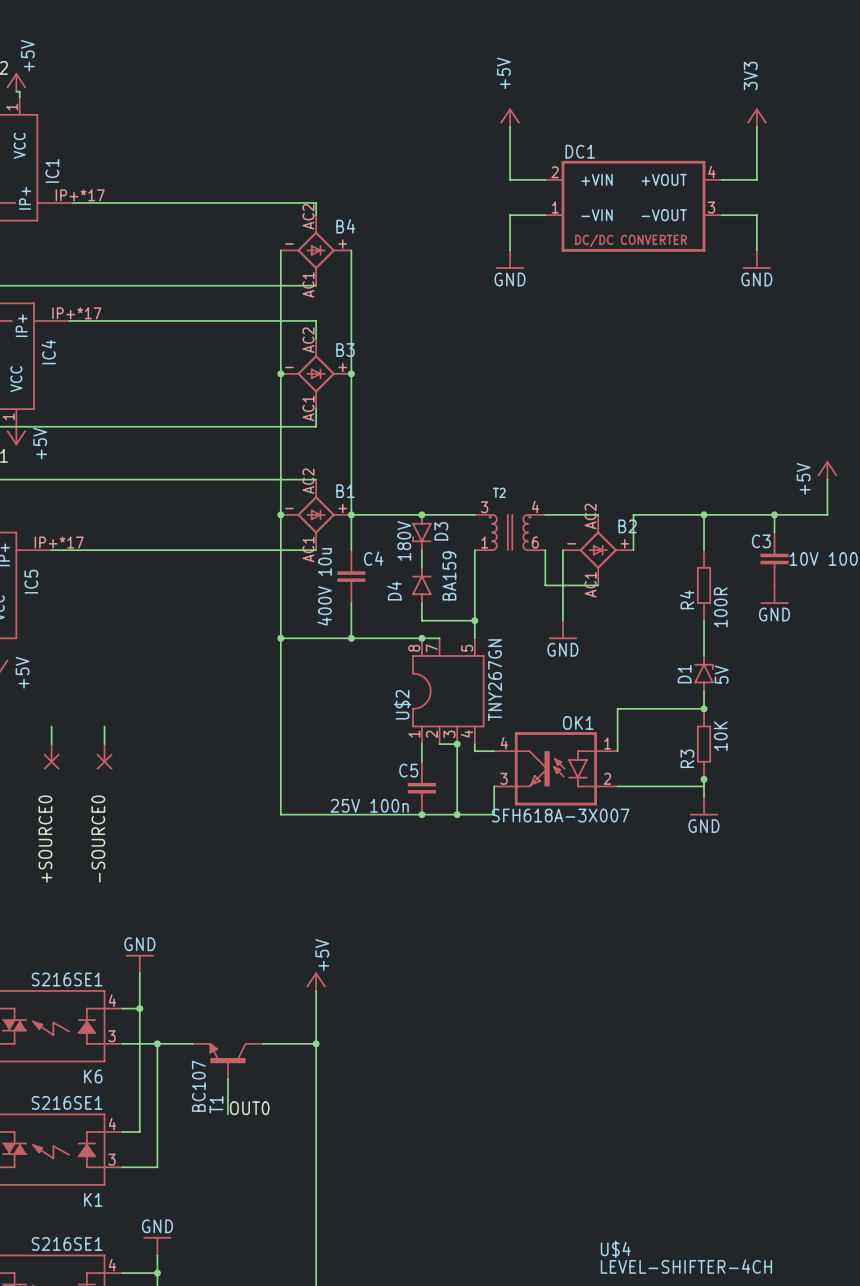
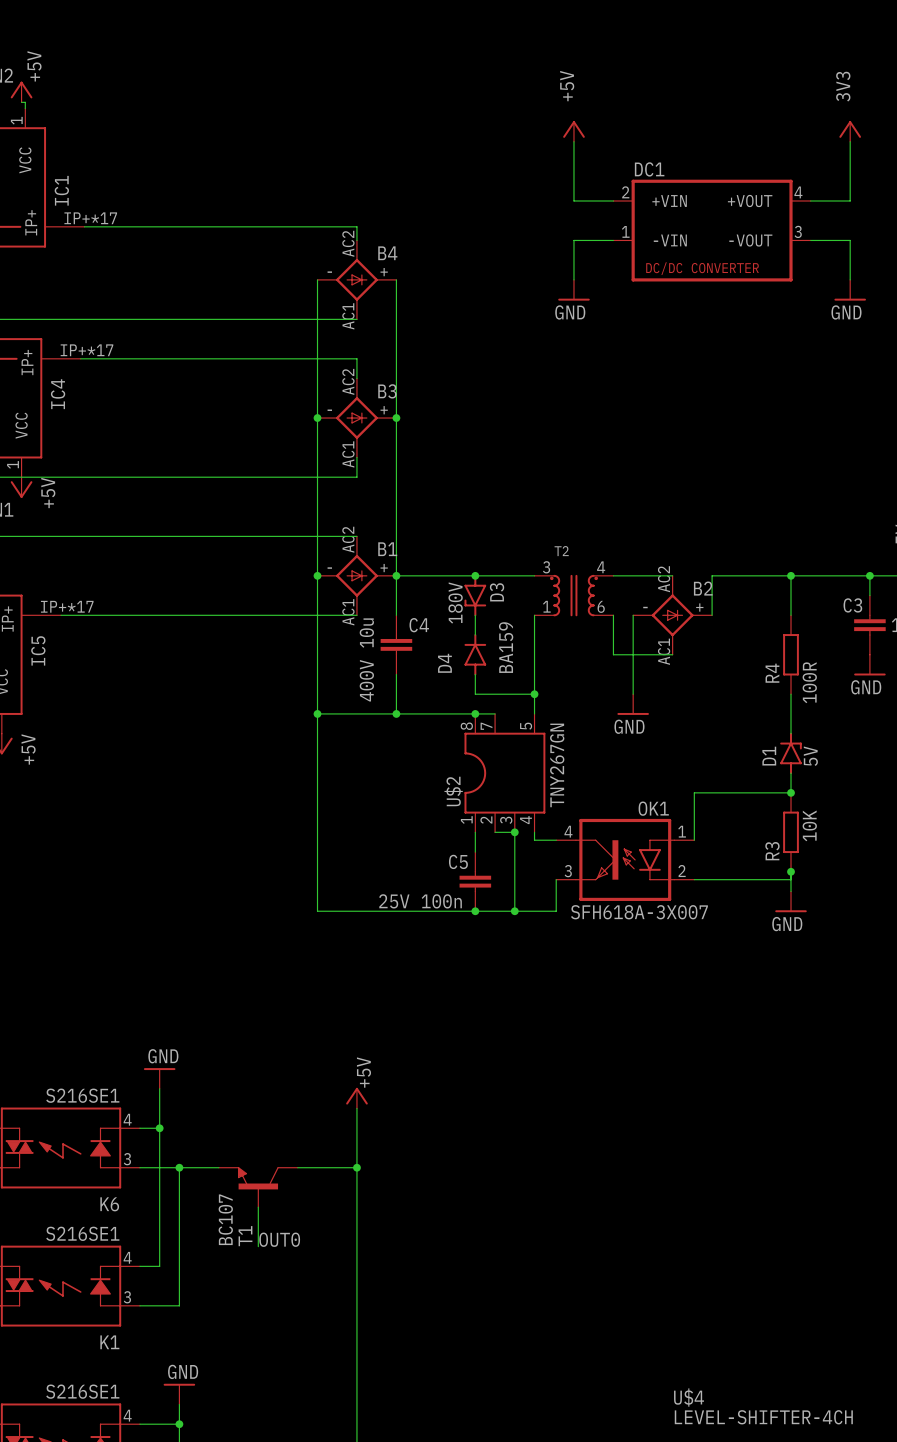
wire: (51, 726) (51, 744) -> none
wire: (104, 726) (104, 744) -> none
part: (51, 756) -> none
part: (104, 756) -> none
label: +SOURCE0 (45, 839) -> none
label: -SOURCE0 (98, 839) -> none

